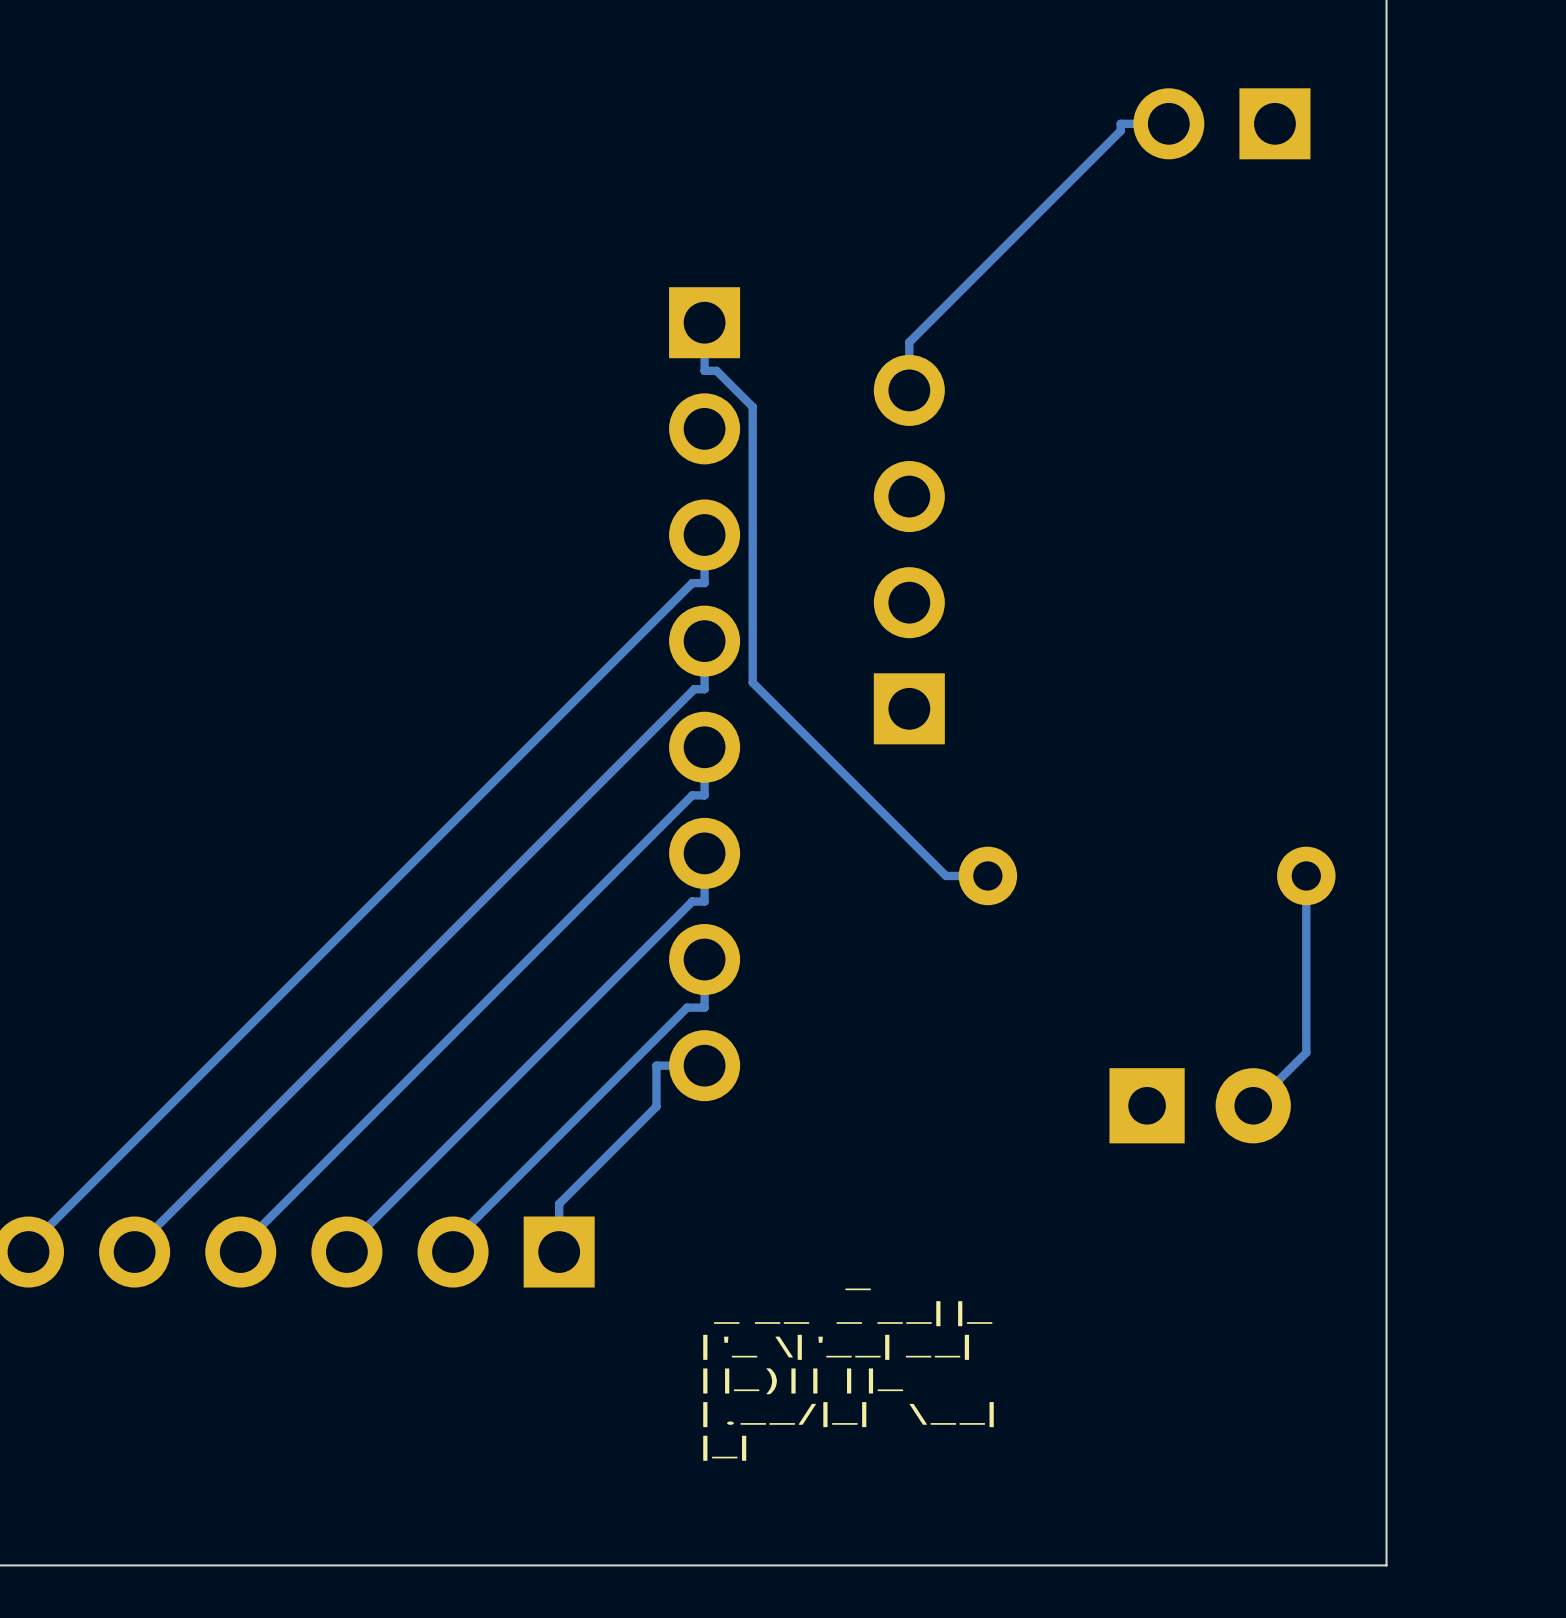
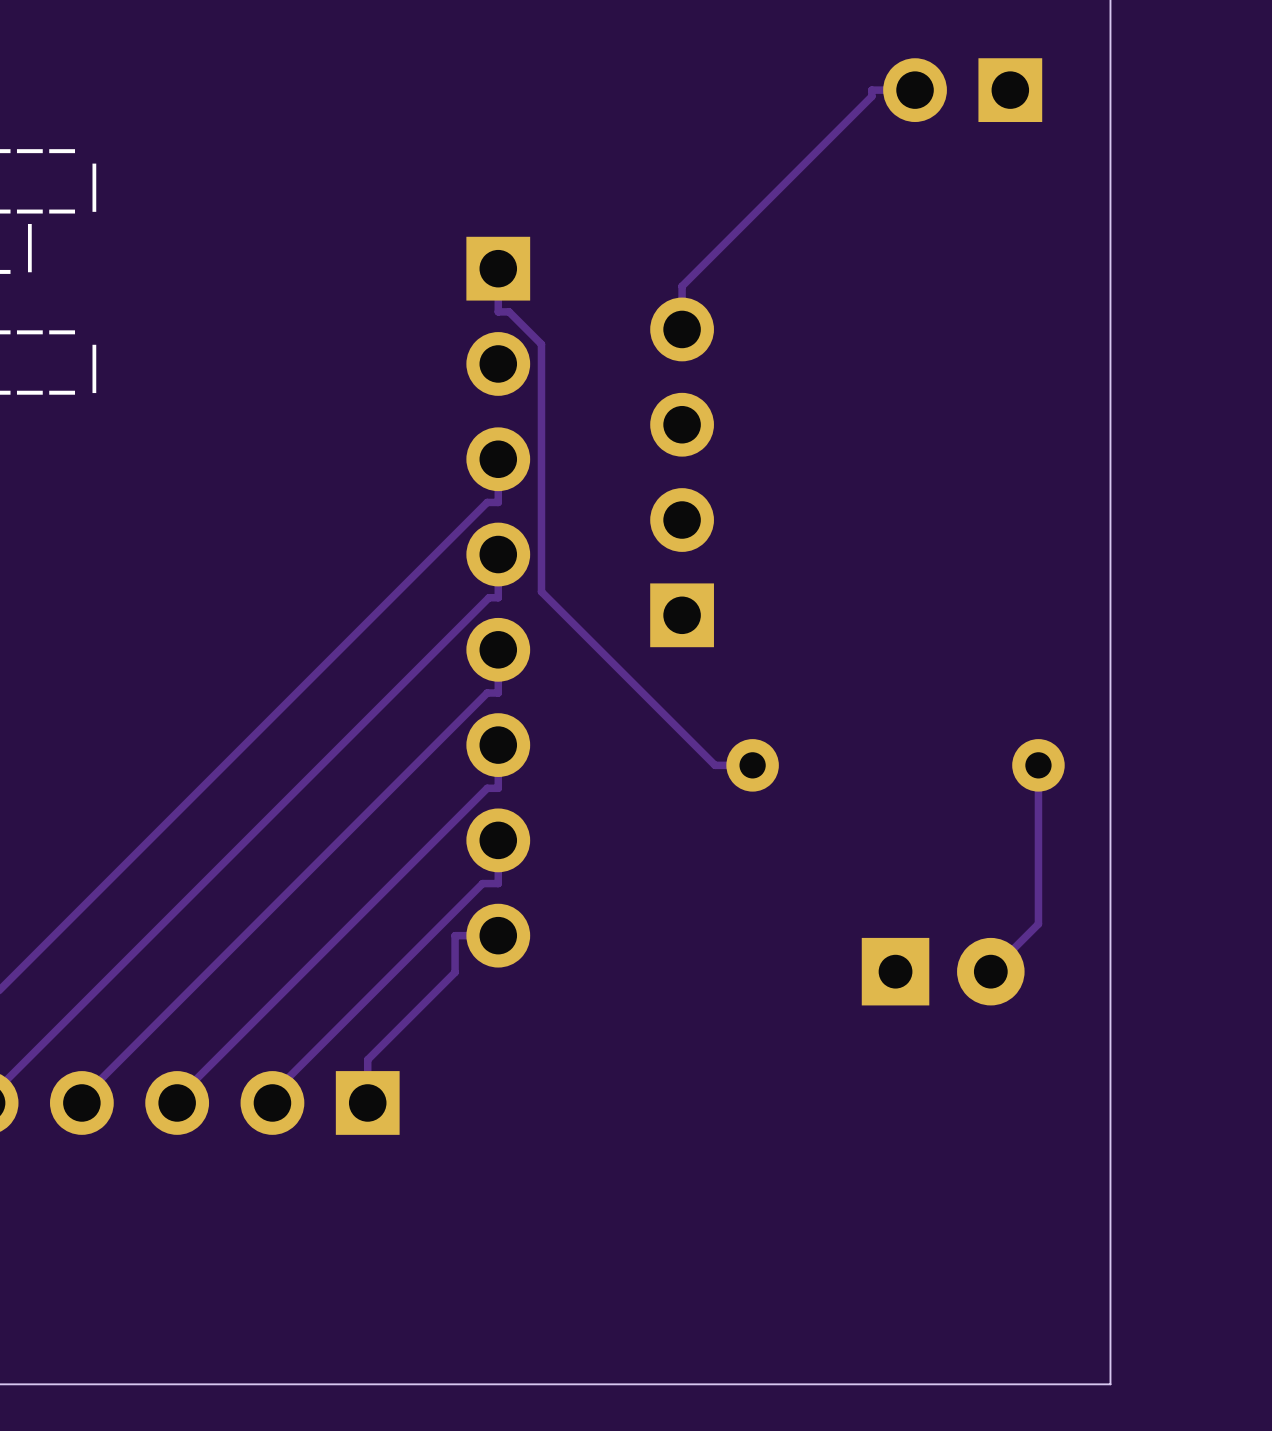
text: _ (858, 1289) -> none
text: _ __ _ __| |_ (853, 1313) -> none
text: | '_ \| '__| __| (836, 1347) -> none
text: | |_) | | | |_ (803, 1381) -> none
text: | .__/|_| \__| (848, 1414) -> none
text: |_| (724, 1448) -> none

